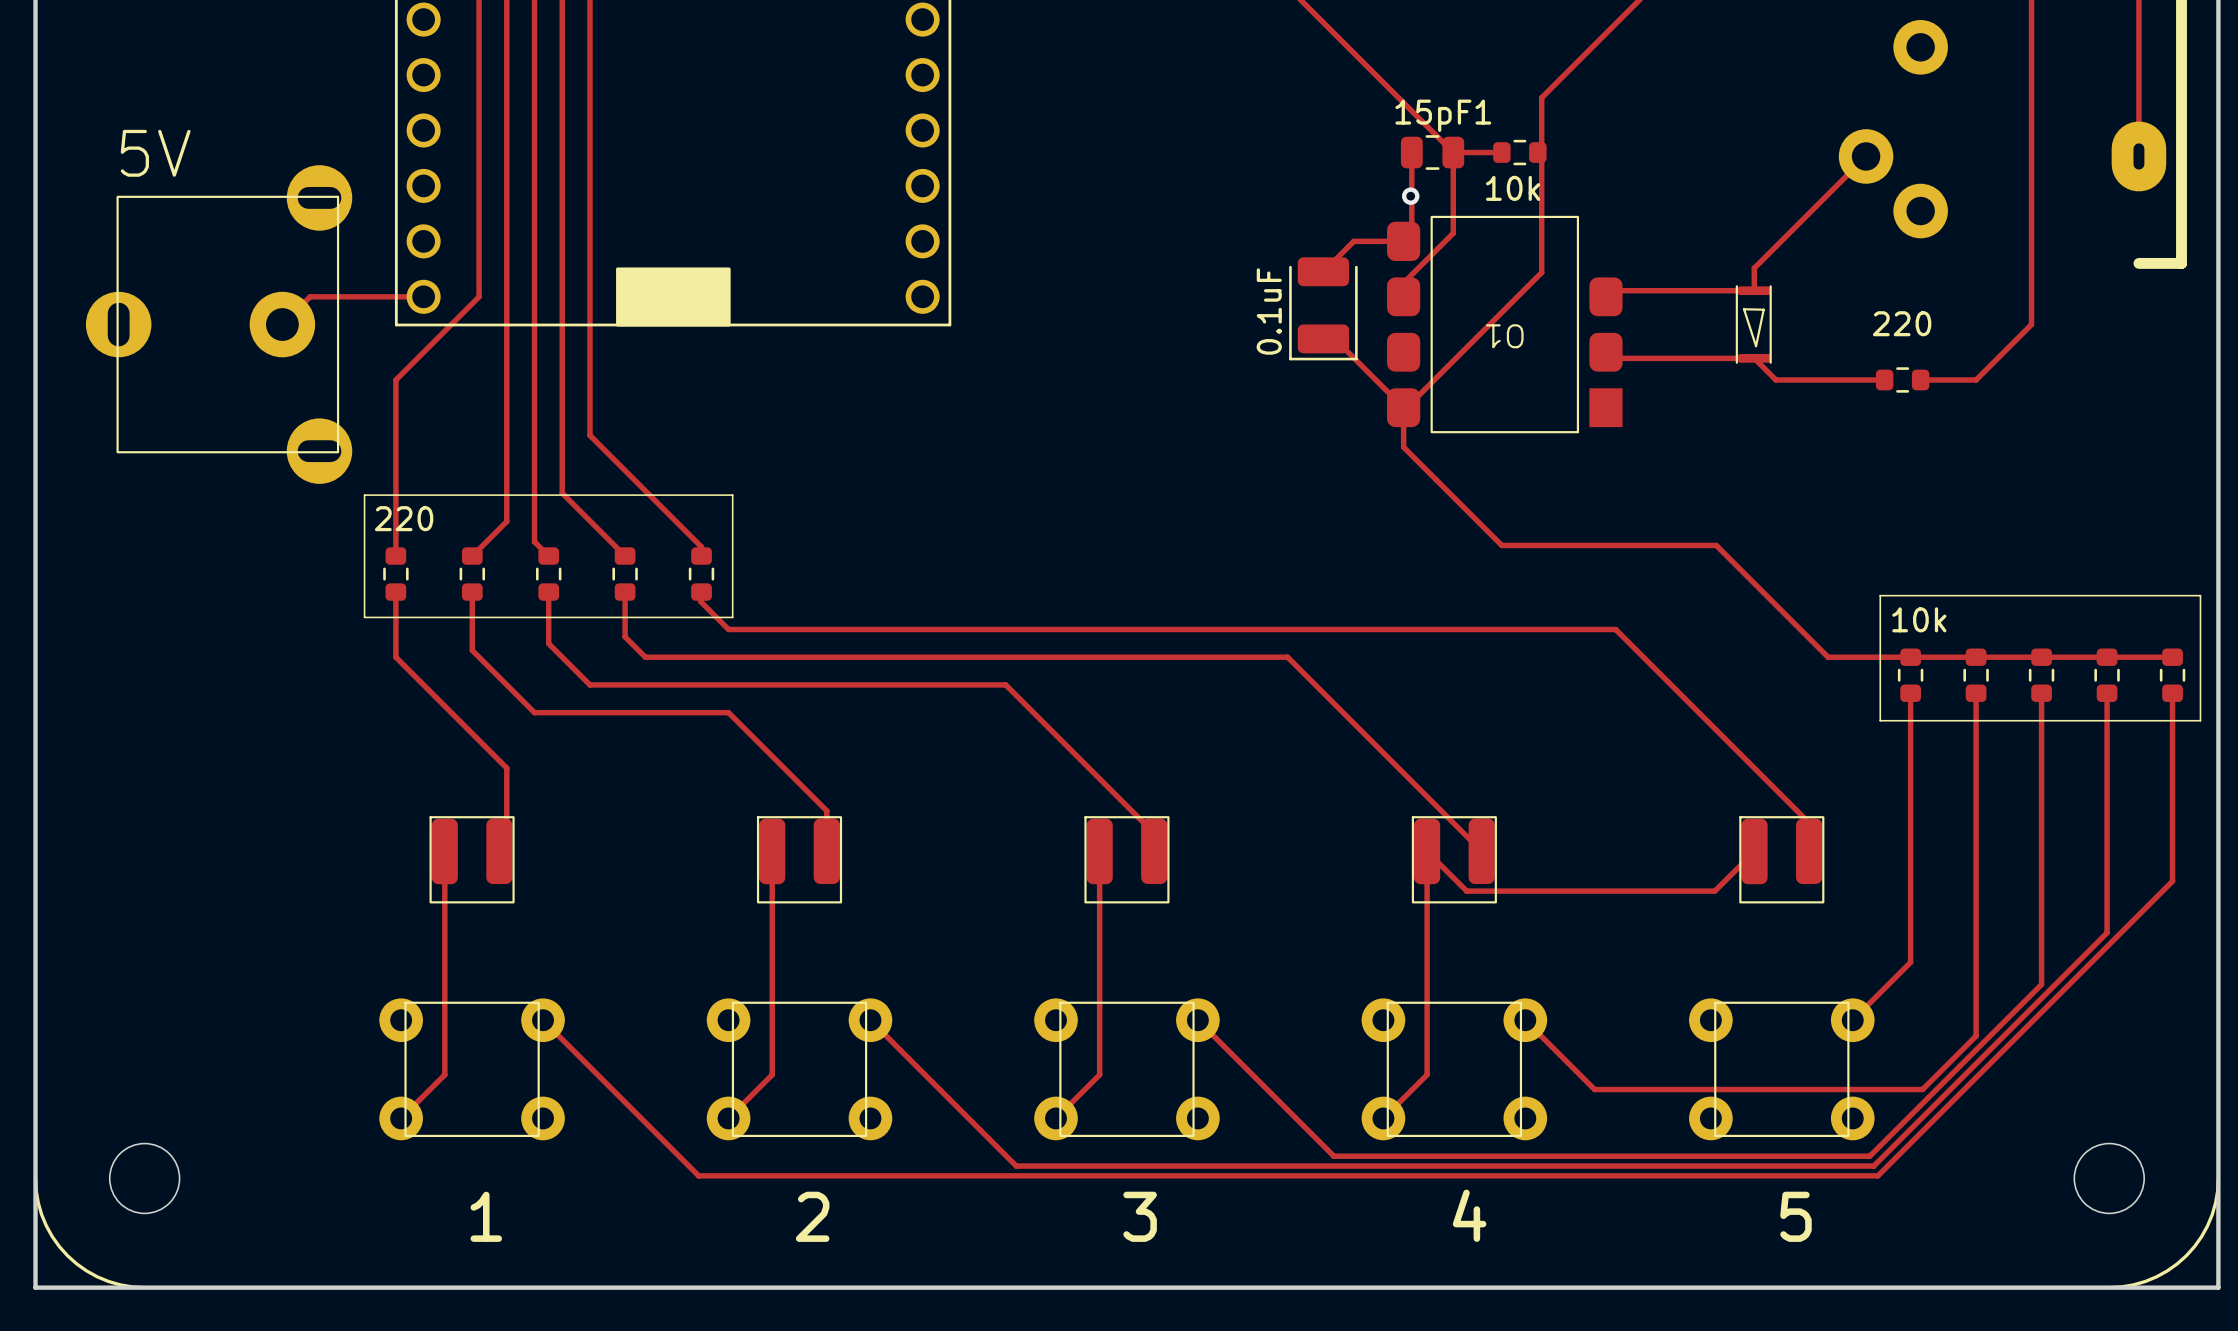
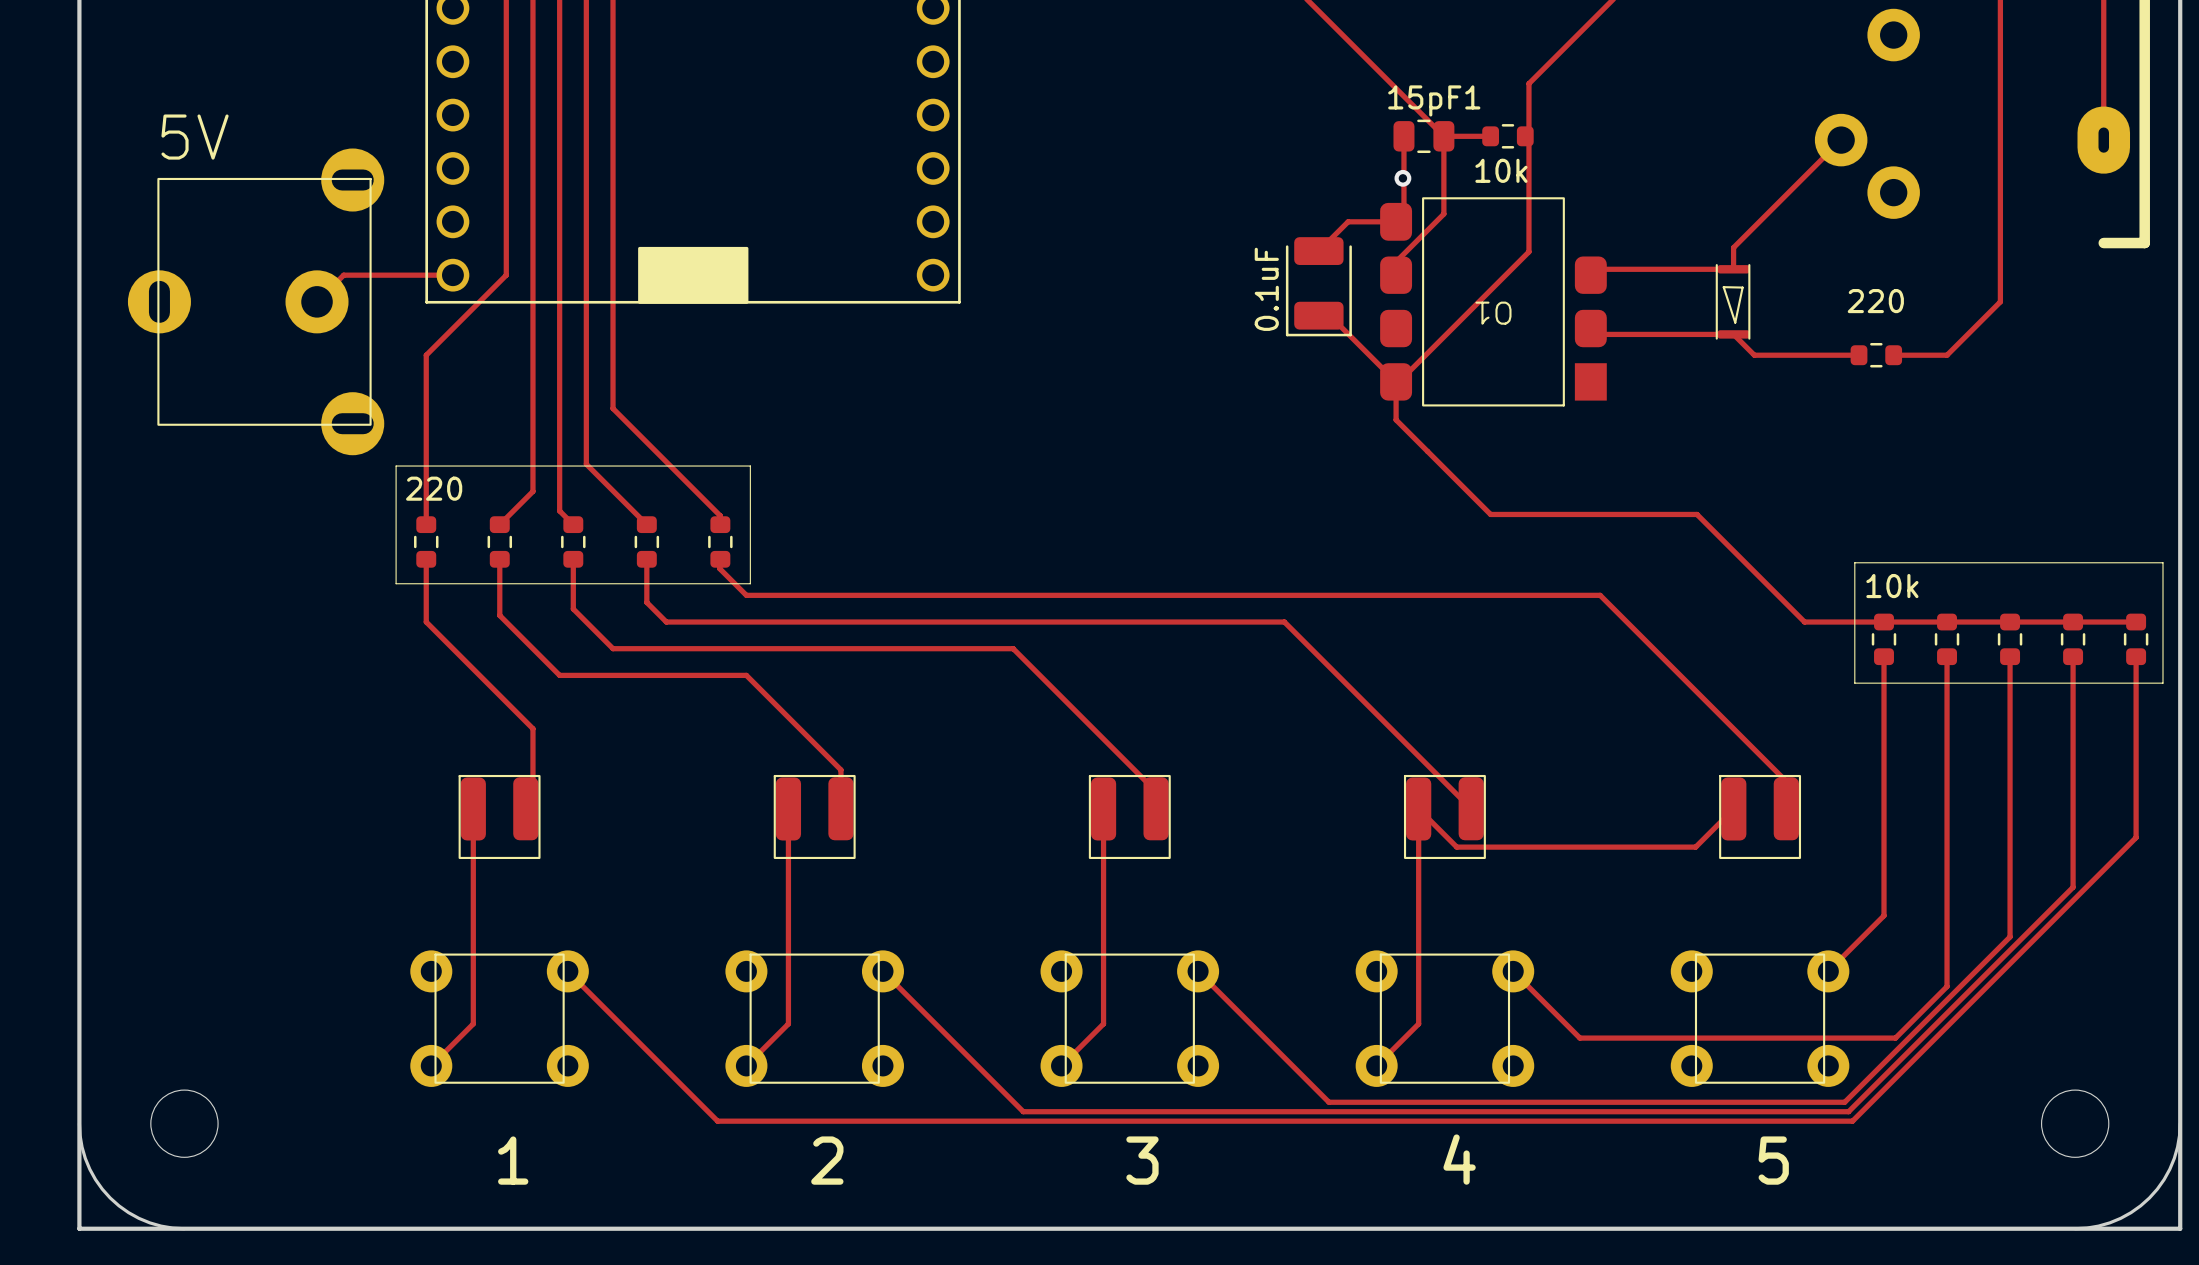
line: (35, 1178) (41, 1214) (52, 1236) (67, 1255) (97, 1276) (120, 1284) (144, 1287) -> none
board edge: none -> (79, 1123) (82, 1147) (89, 1169) (110, 1197) (128, 1212) (149, 1222) (184, 1228)
line: (2218, 1178) (2212, 1214) (2201, 1236) (2186, 1255) (2156, 1276) (2133, 1284) (2109, 1287) -> none
board edge: none -> (2180, 1123) (2174, 1158) (2164, 1179) (2149, 1197) (2120, 1218) (2098, 1226) (2075, 1228)

